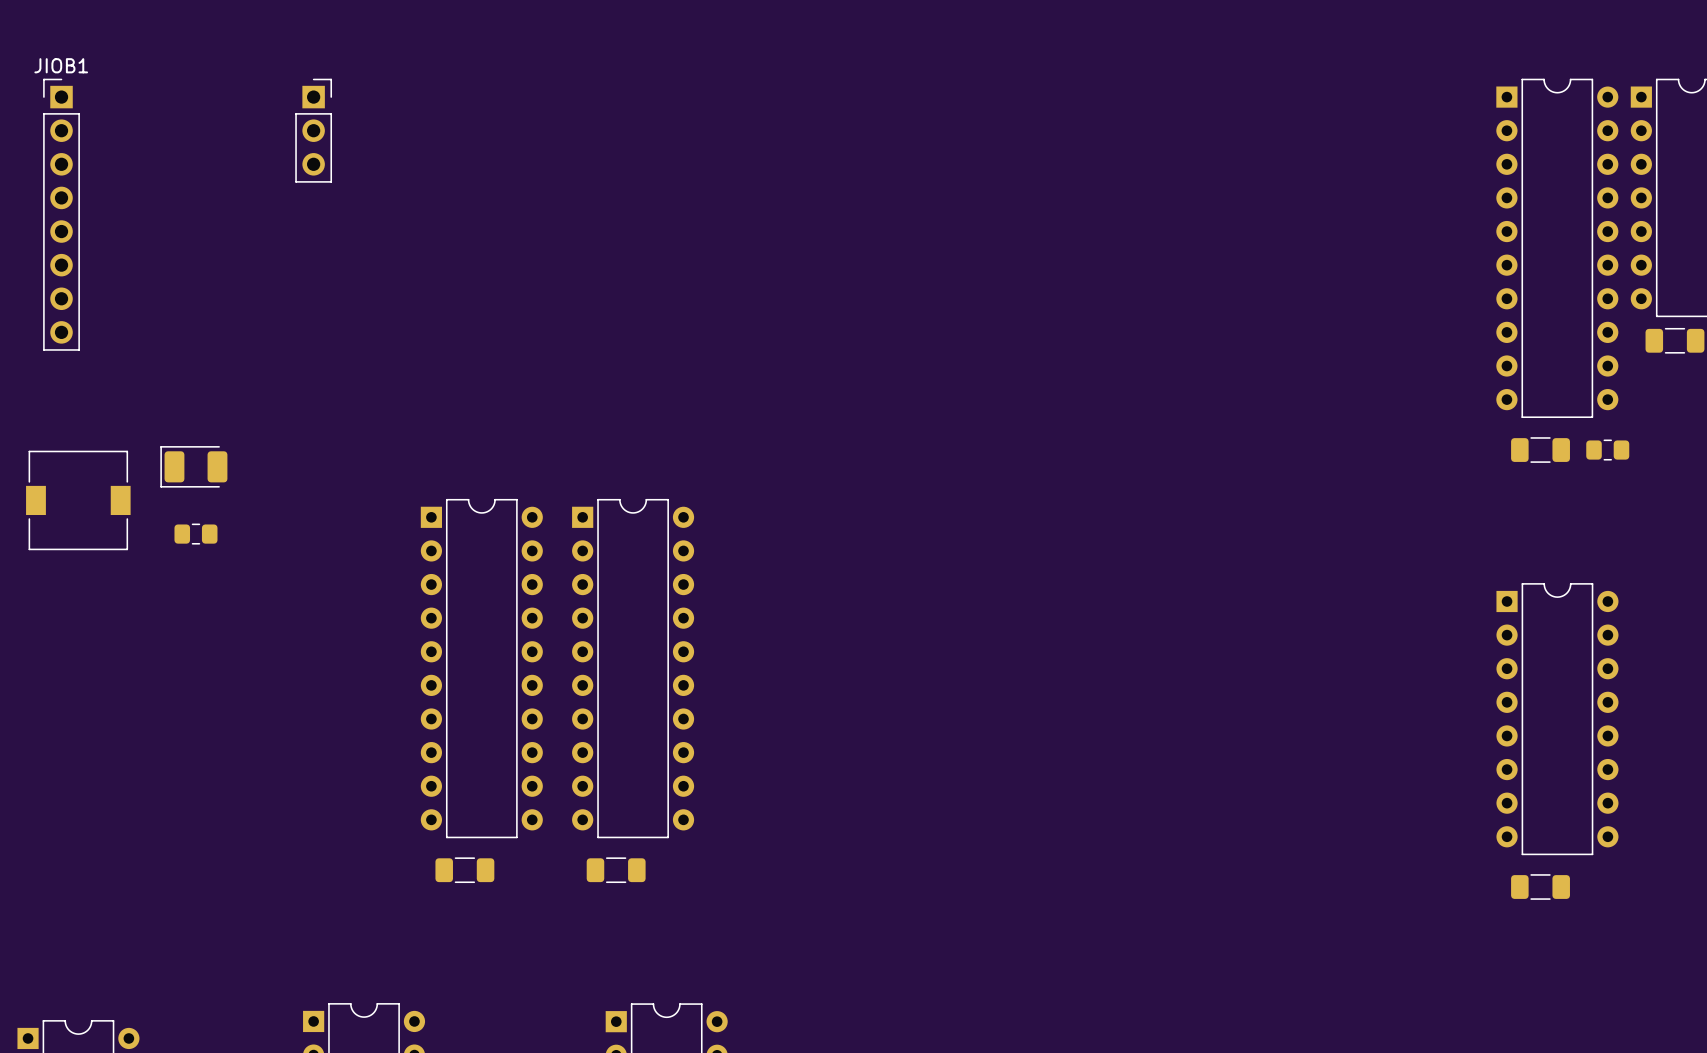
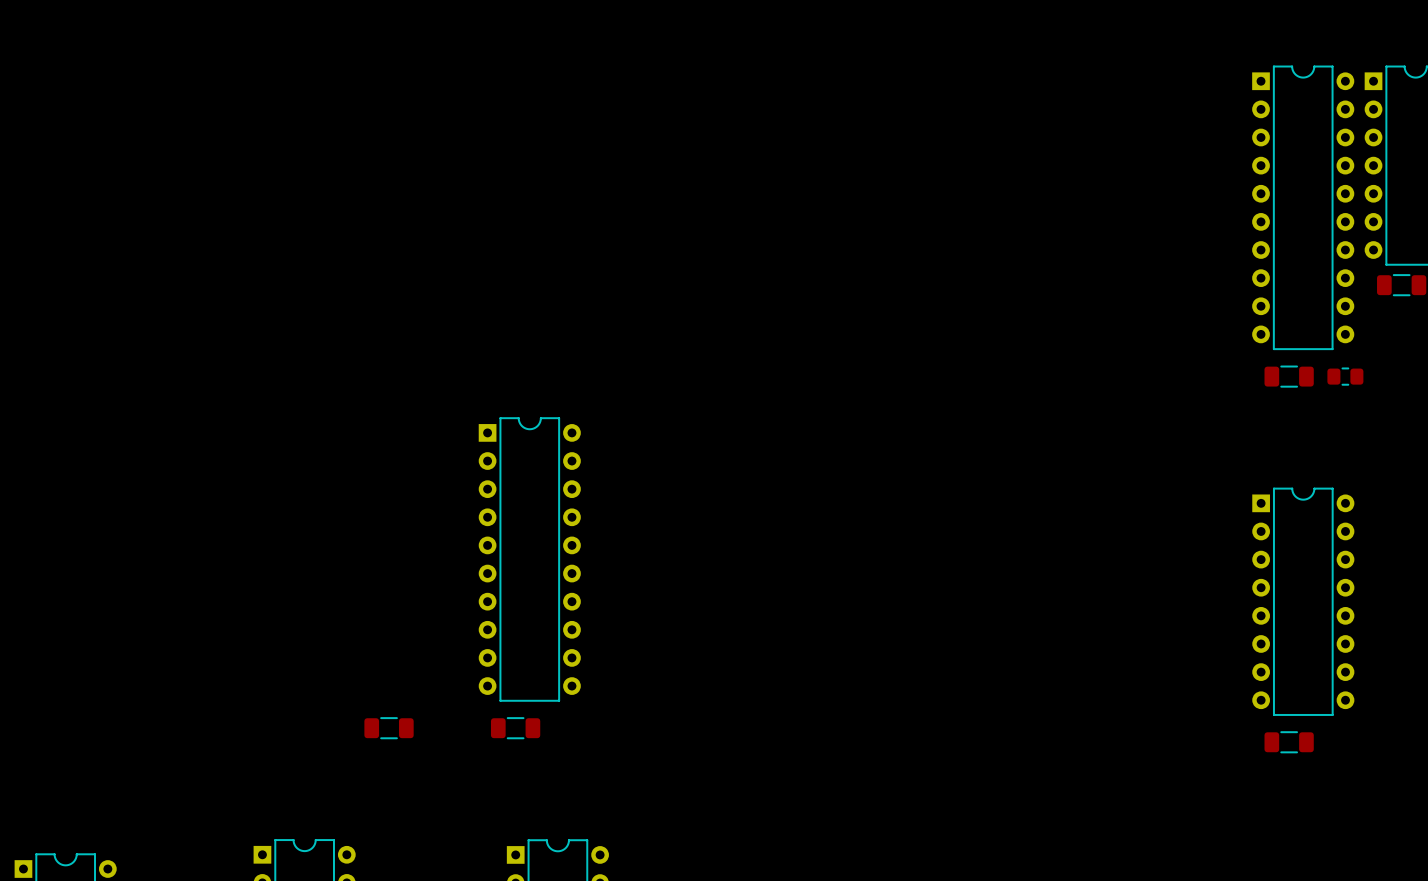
part: (313, 130) -> none
JIOB1: (61, 214) -> none
part: (193, 466) -> none
part: (78, 500) -> none
part: (195, 534) -> none
part: (481, 668) -> none

